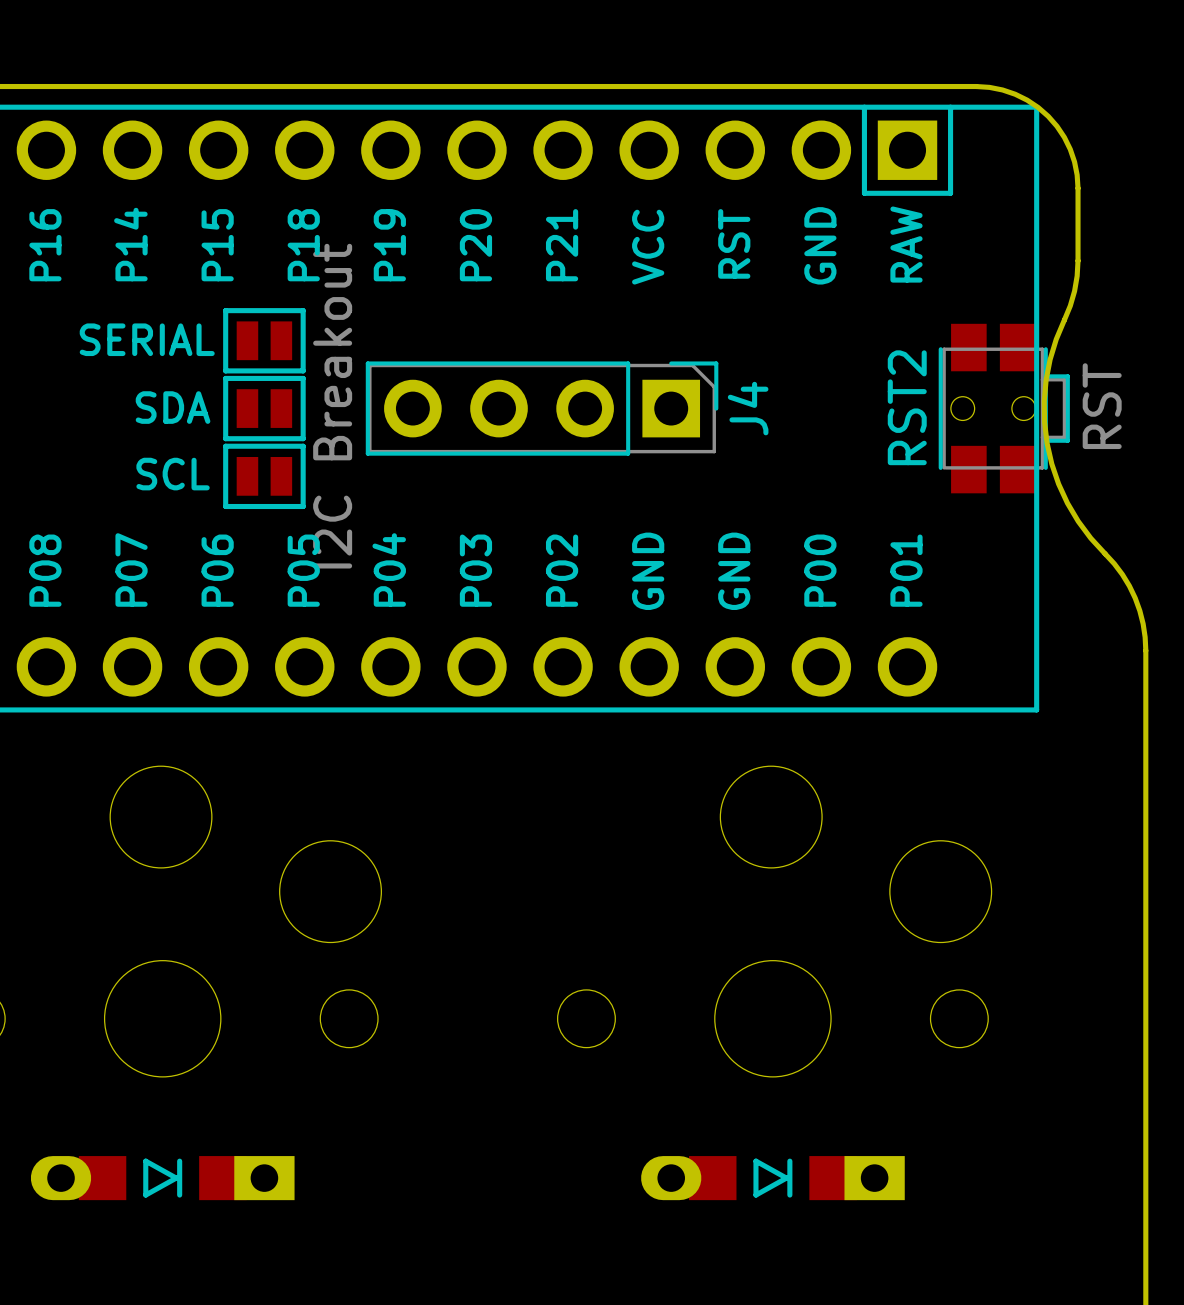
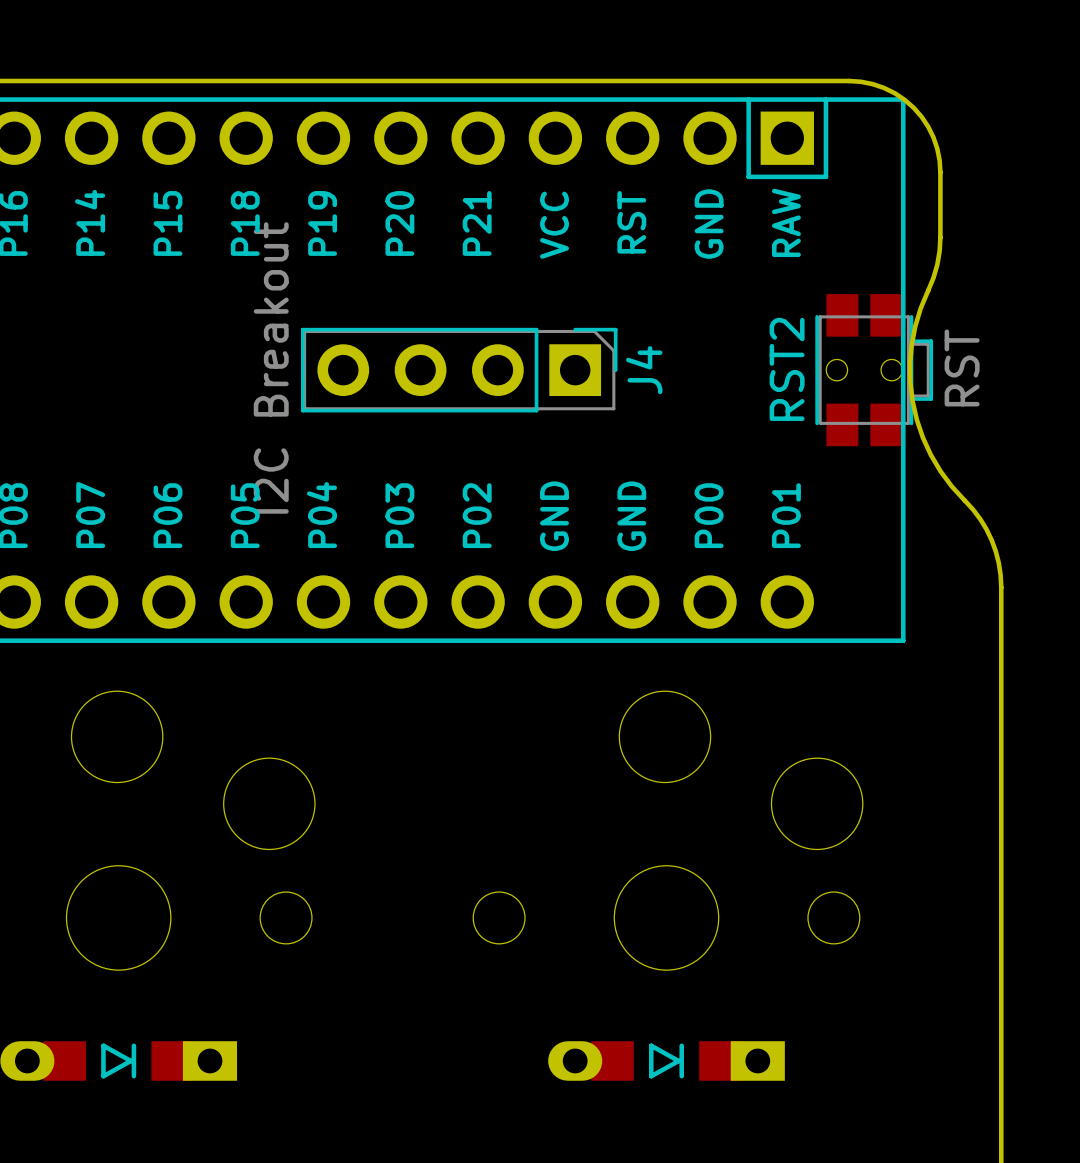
part: SERIAL (264, 340) -> none
part: SDA (264, 408) -> none
part: SCL (264, 476) -> none

